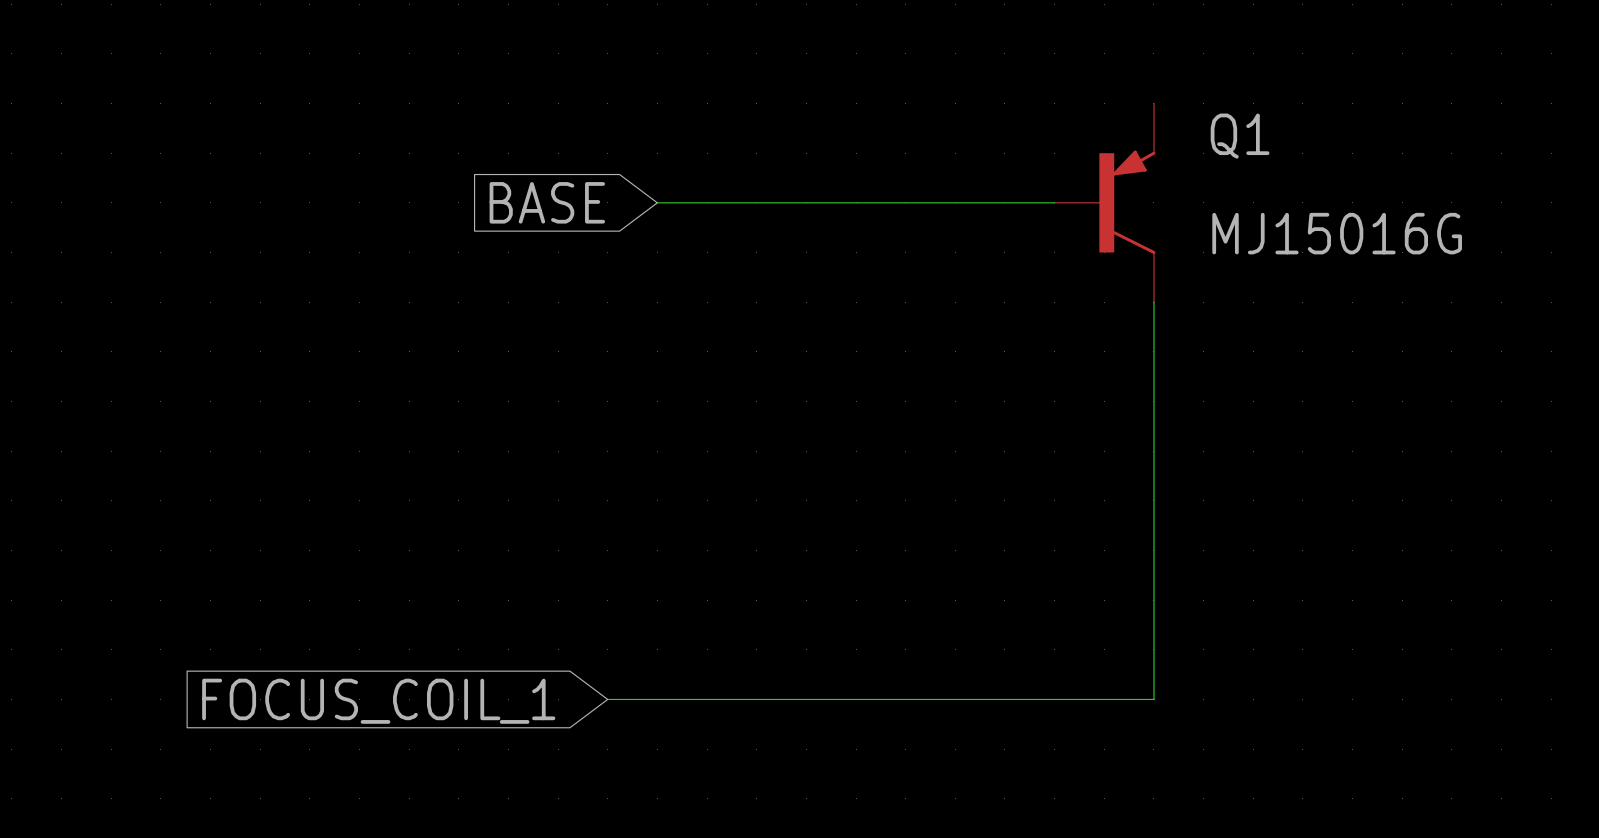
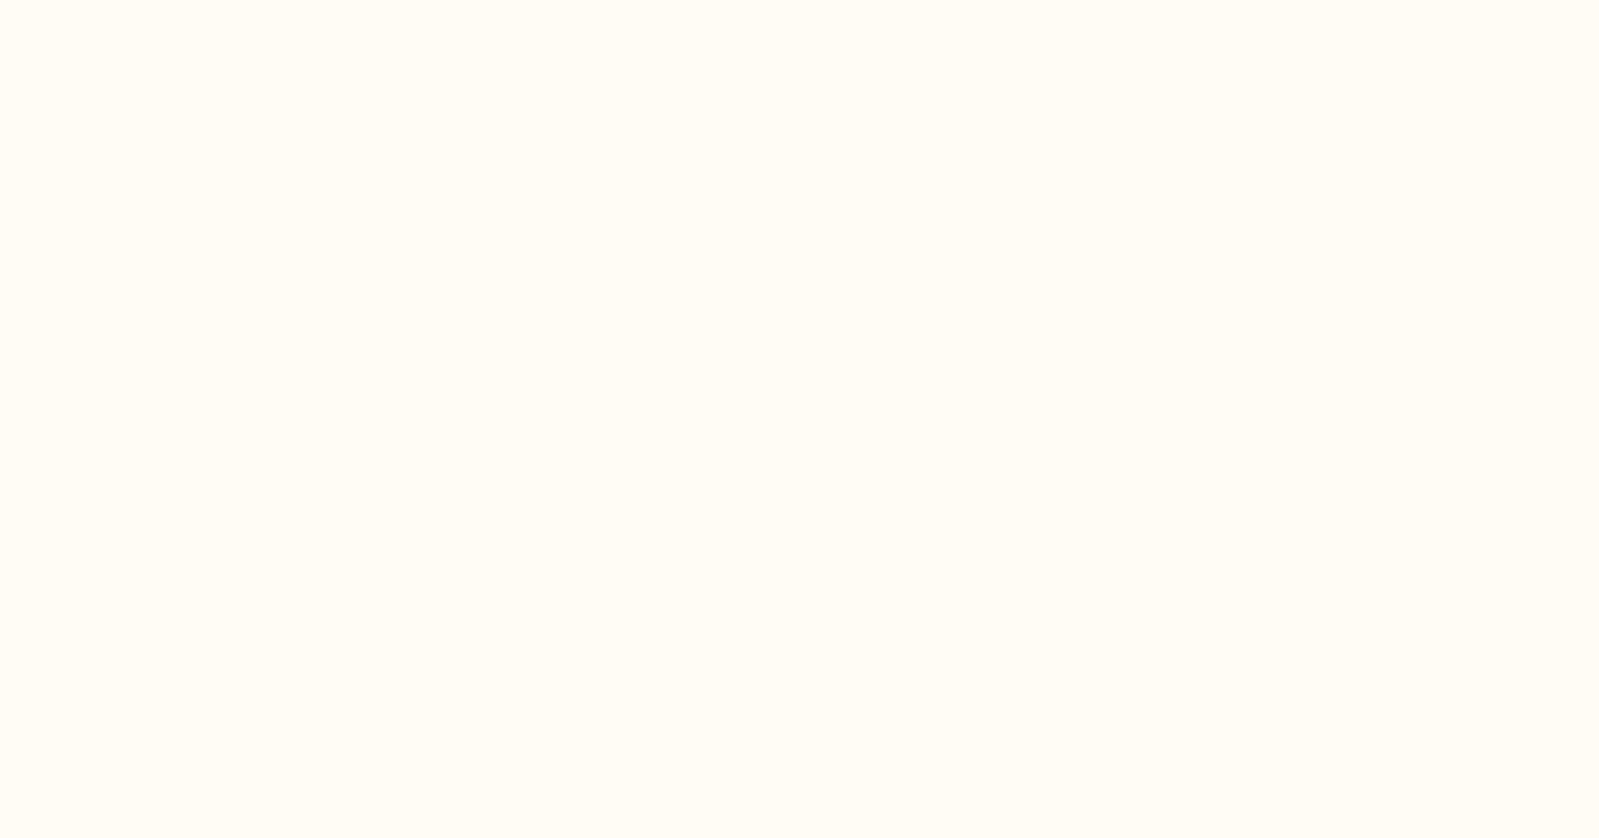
global label: BASE (547, 202) -> none
wire: (657, 202) (1054, 202) -> none
Q1: MJ15016G (1105, 202) -> none
wire: (1153, 302) (1153, 699) (607, 699) -> none
global label: FOCUS_COIL_1 (378, 701) -> none

